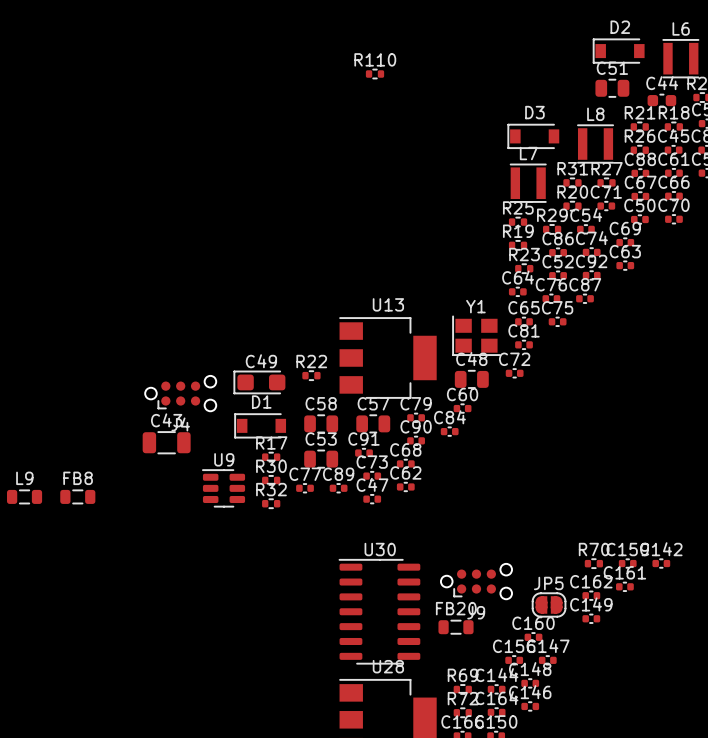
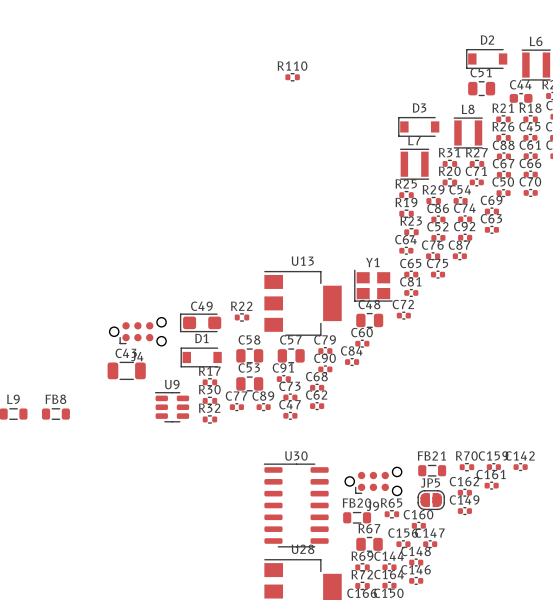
FB21: none -> (432, 470)
R65: none -> (391, 514)
R67: none -> (369, 544)

